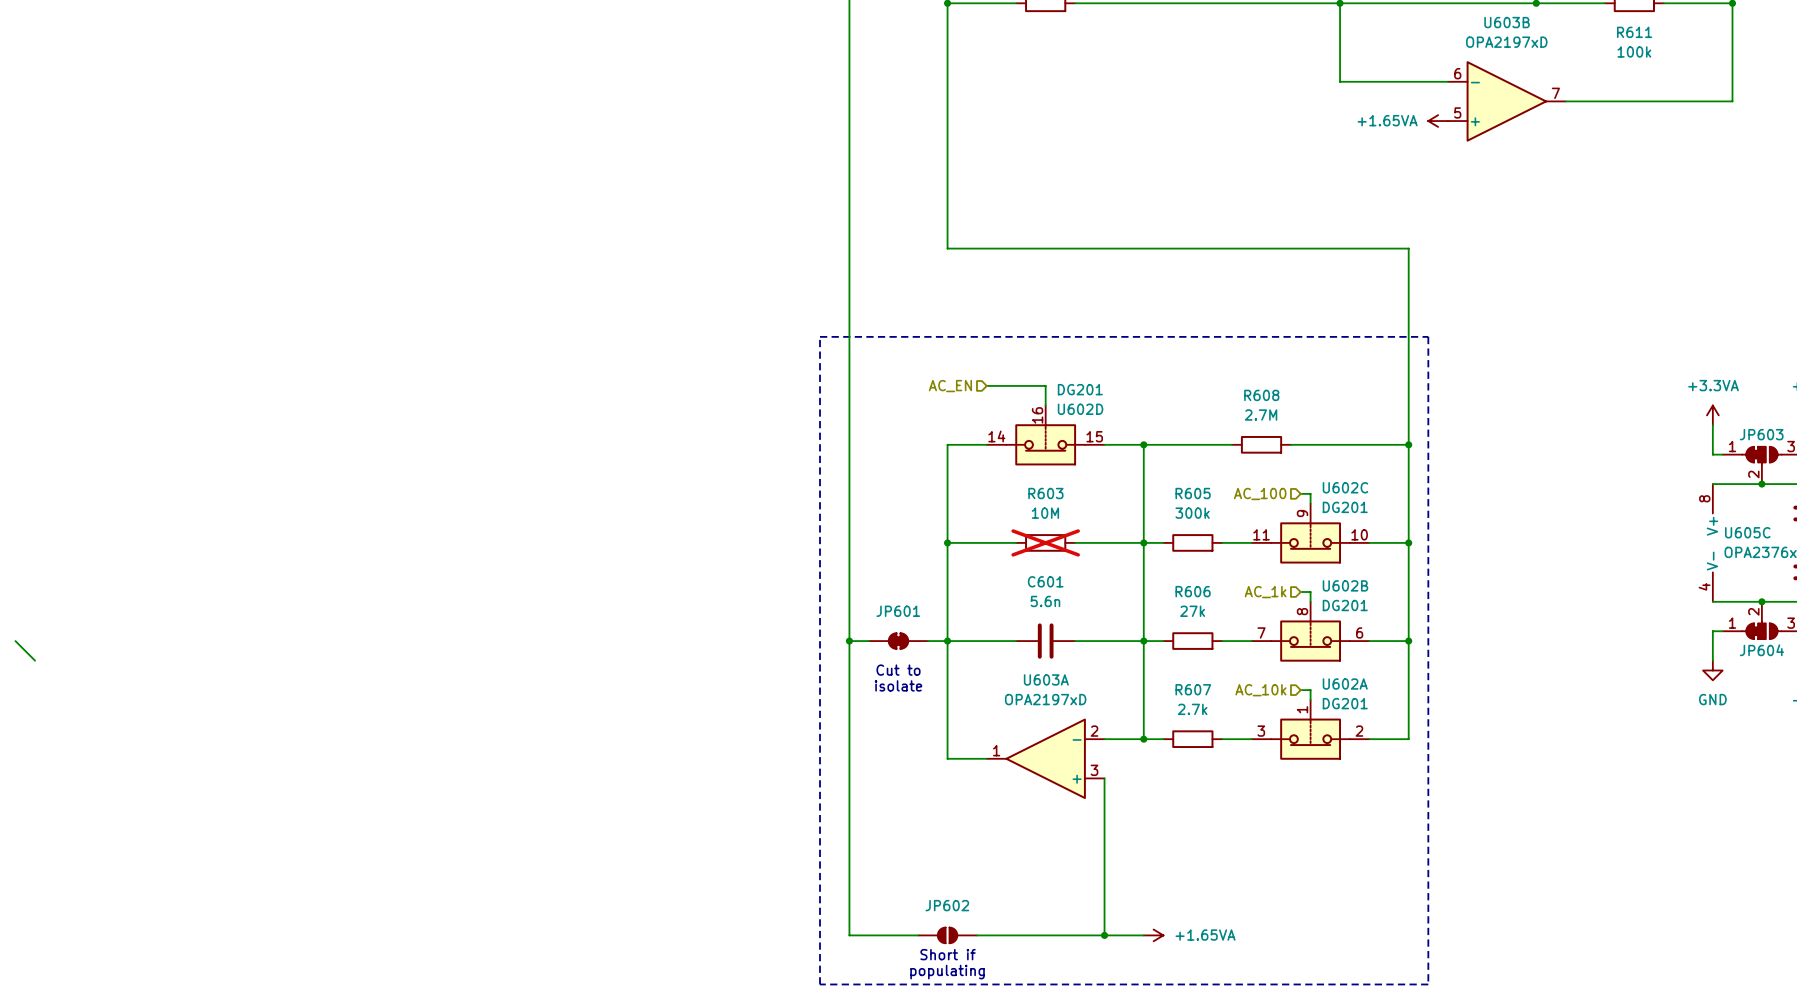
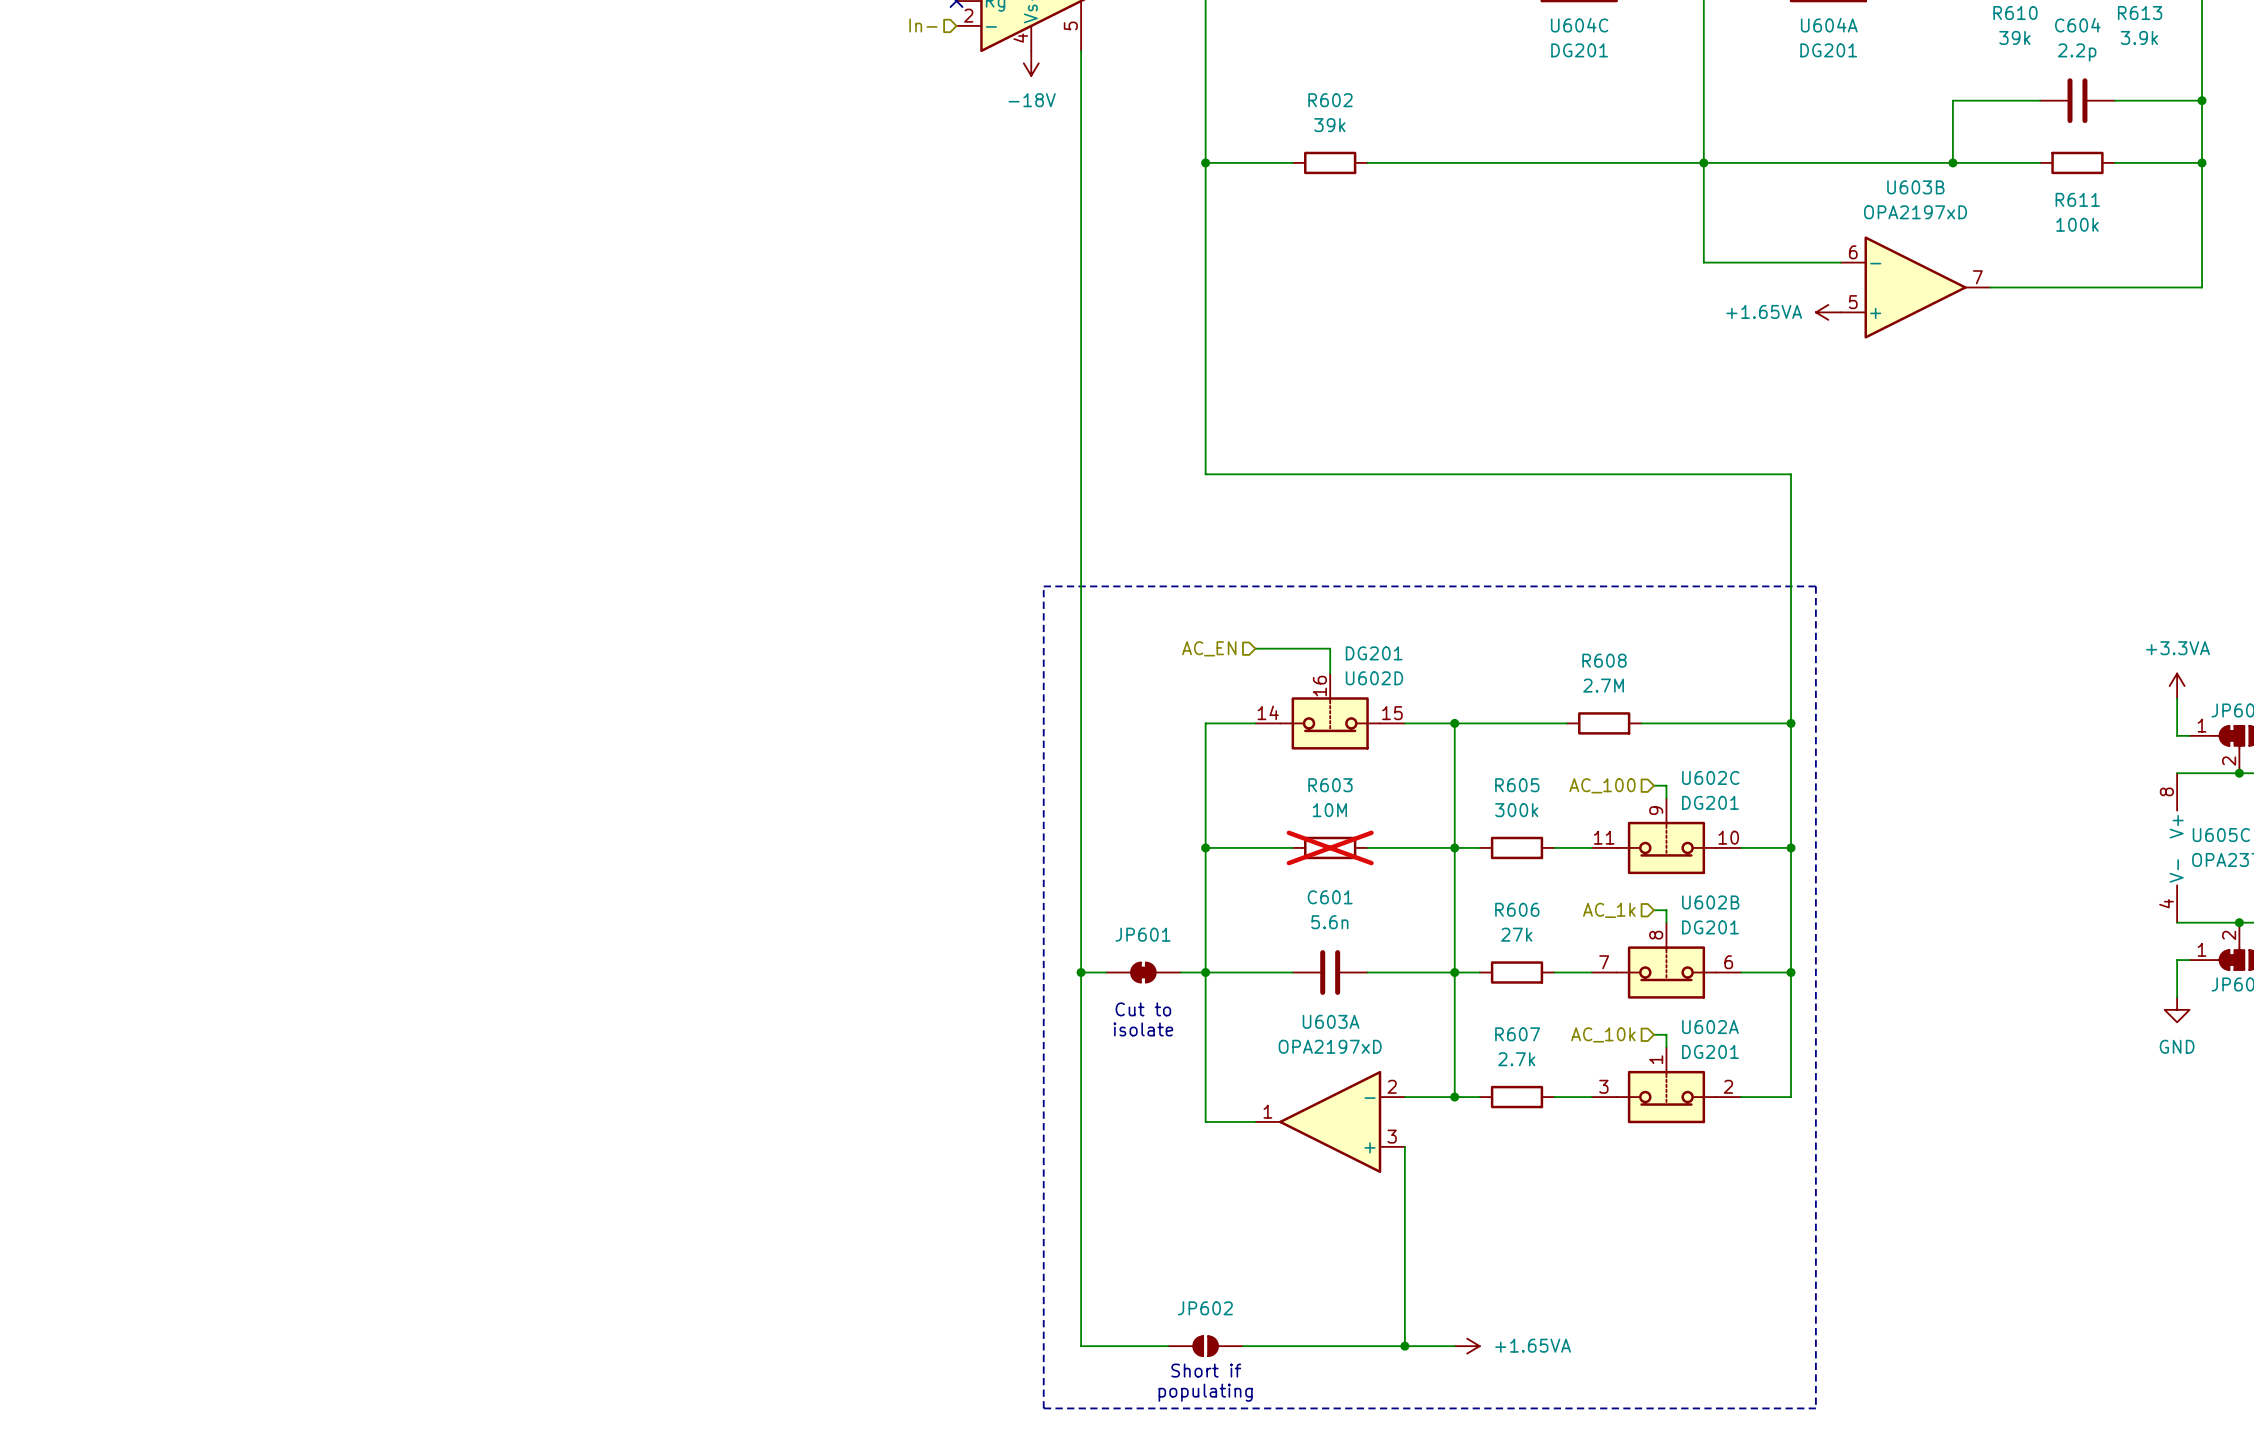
wire: (15, 641) (35, 660) -> none

